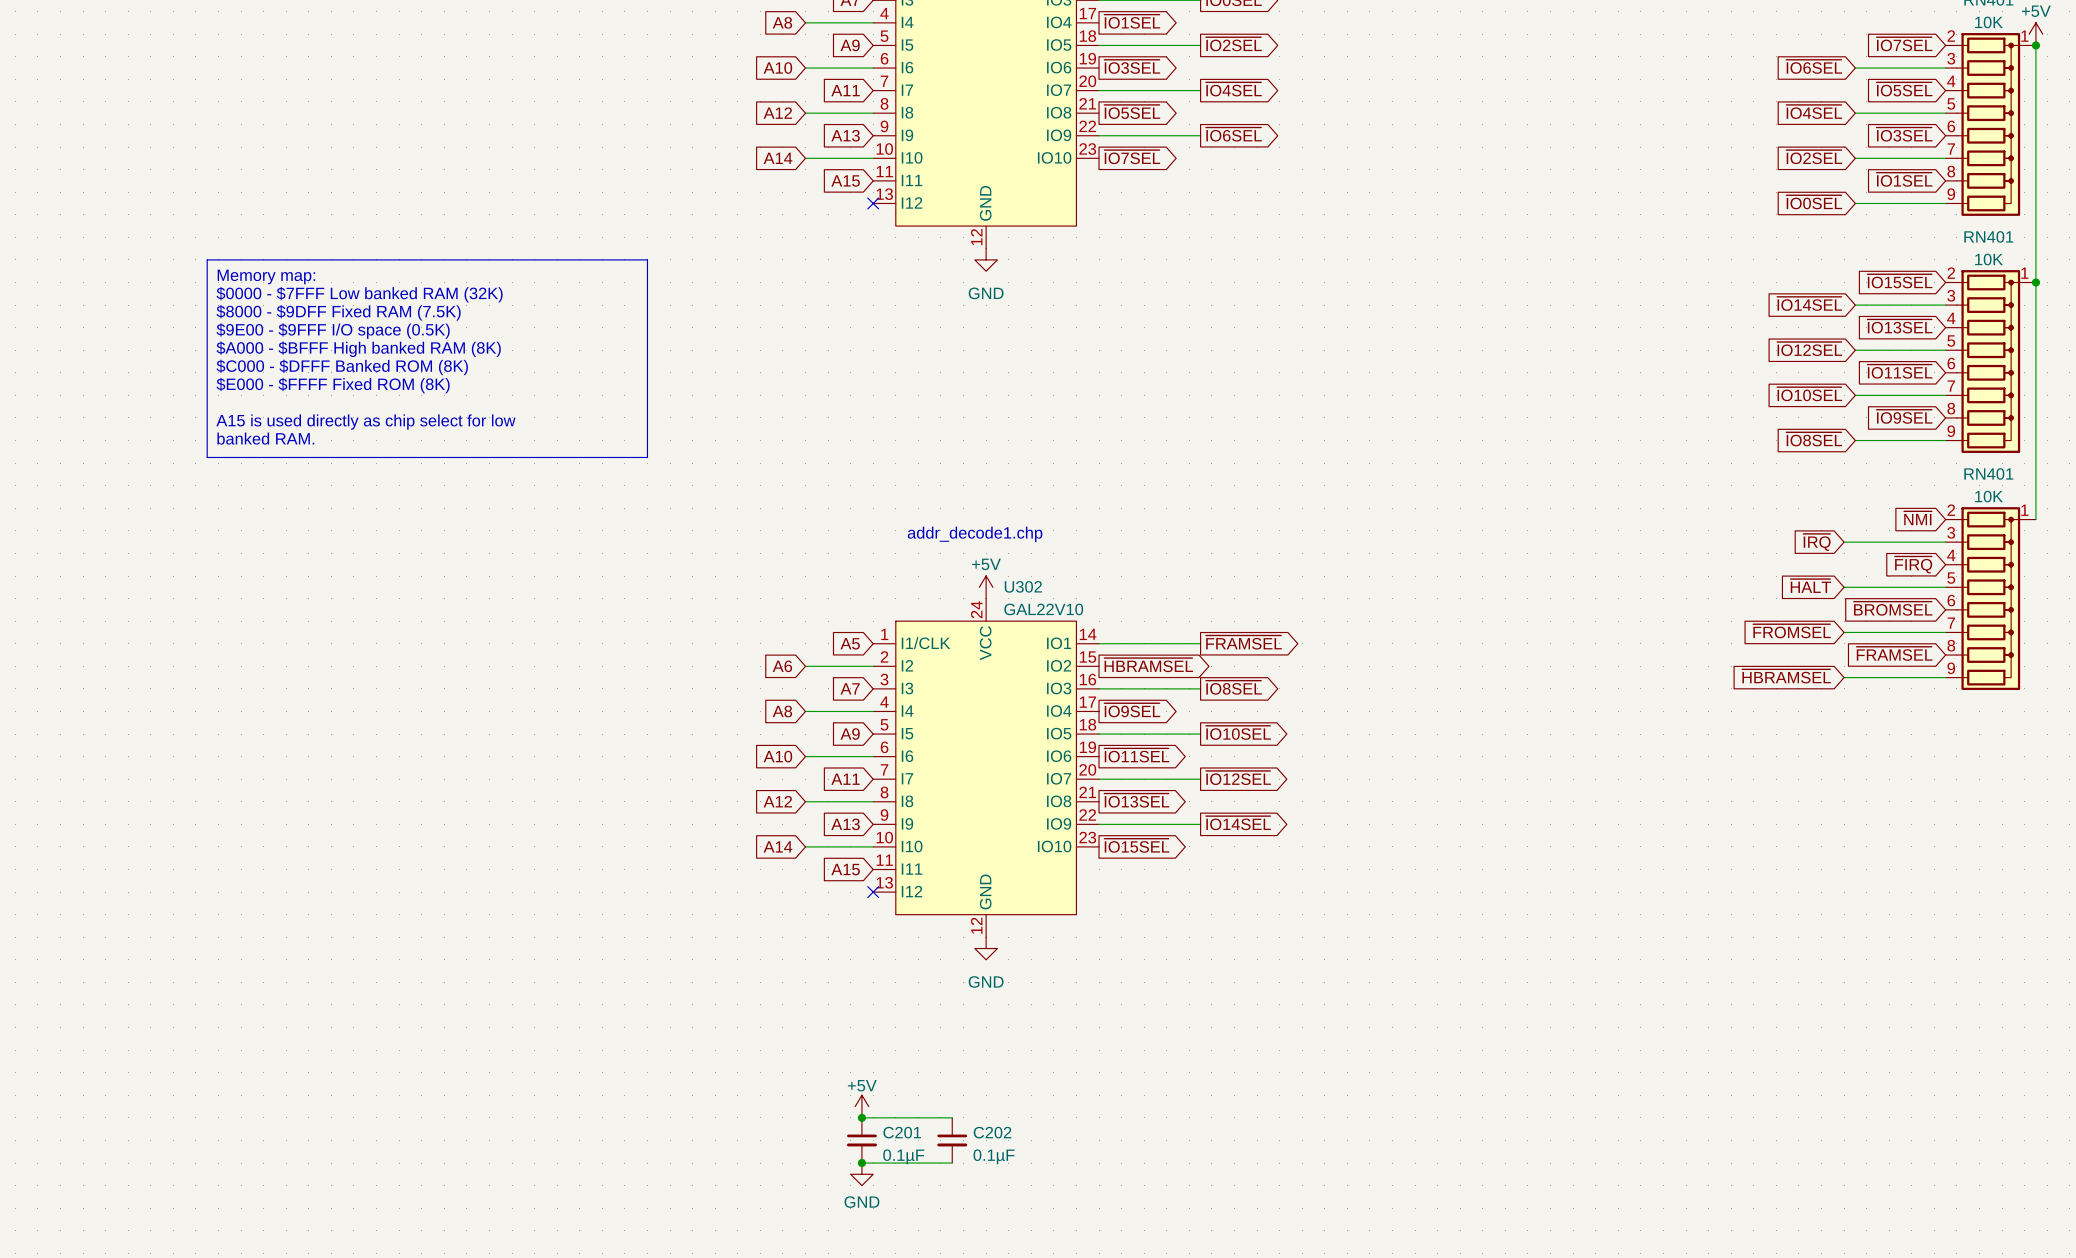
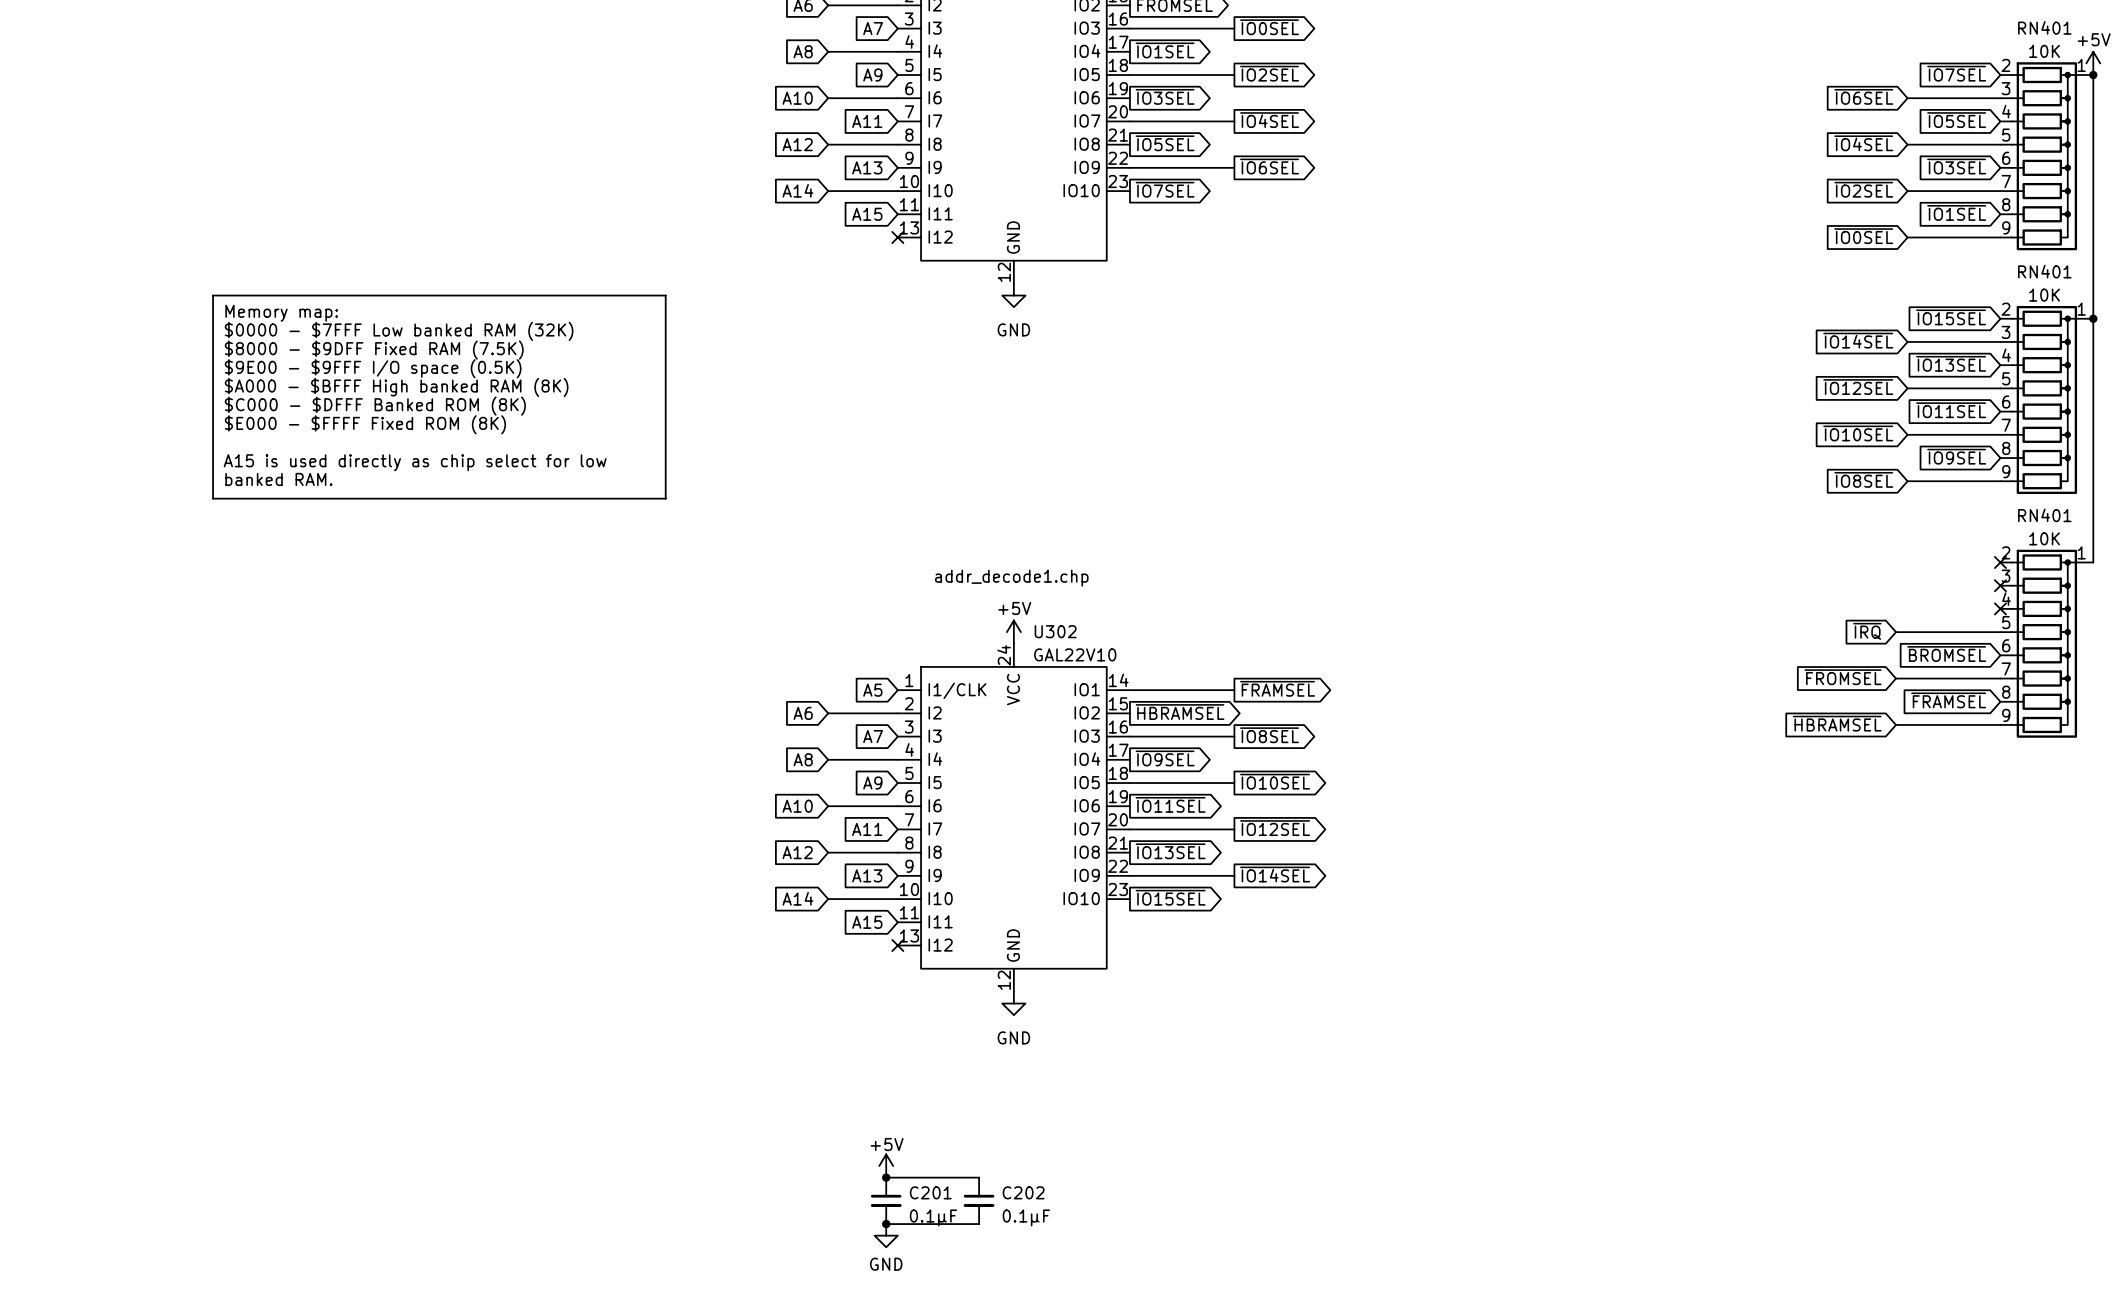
global label: ~{NMI} (1917, 518) -> none
no-connect mark: none -> (2000, 562)
global label: ~{IRQ} (1816, 542) -> none
wire: (1844, 542) (1945, 542) -> none
no-connect mark: none -> (2000, 585)
global label: ~{FIRQ} (1913, 564) -> none
no-connect mark: none -> (2000, 608)
global label: ~{HALT} (1810, 585) -> ~{IRQ} (1867, 631)

